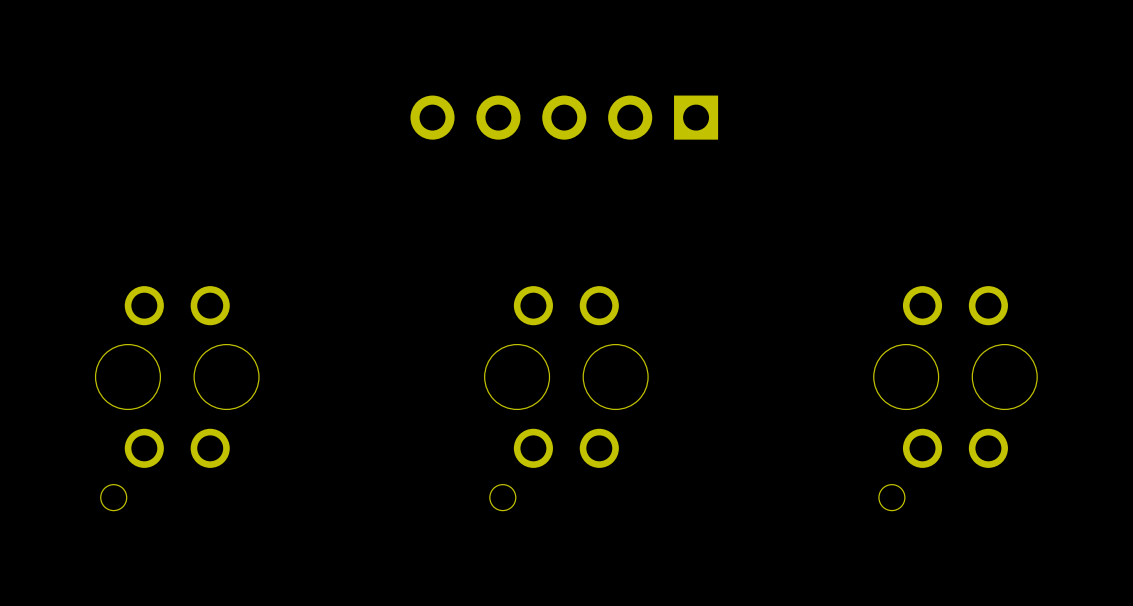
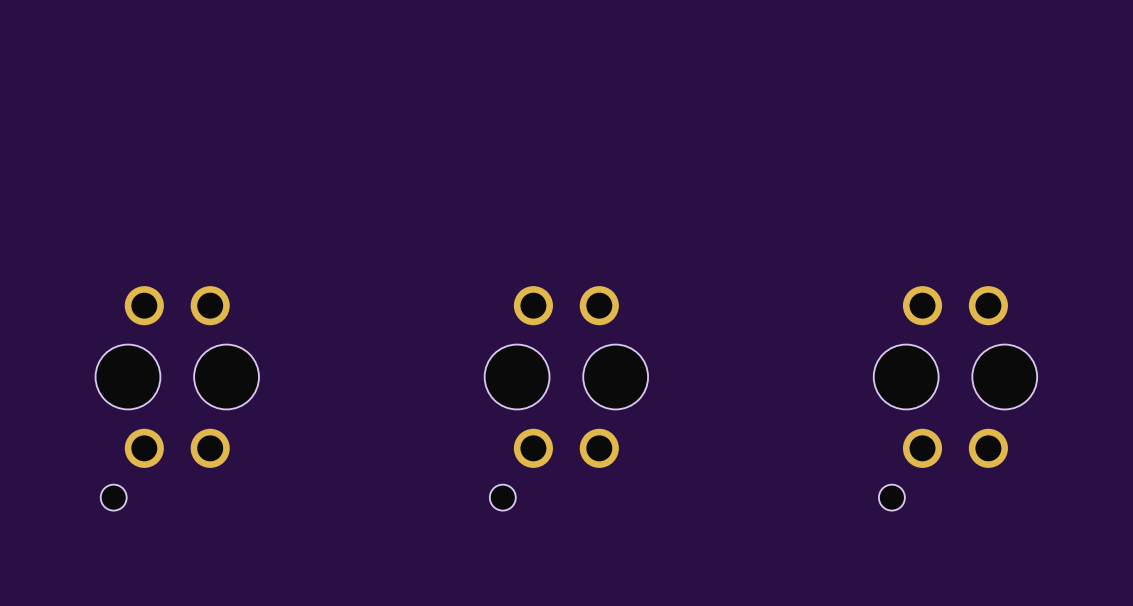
part: (564, 117) -> none

